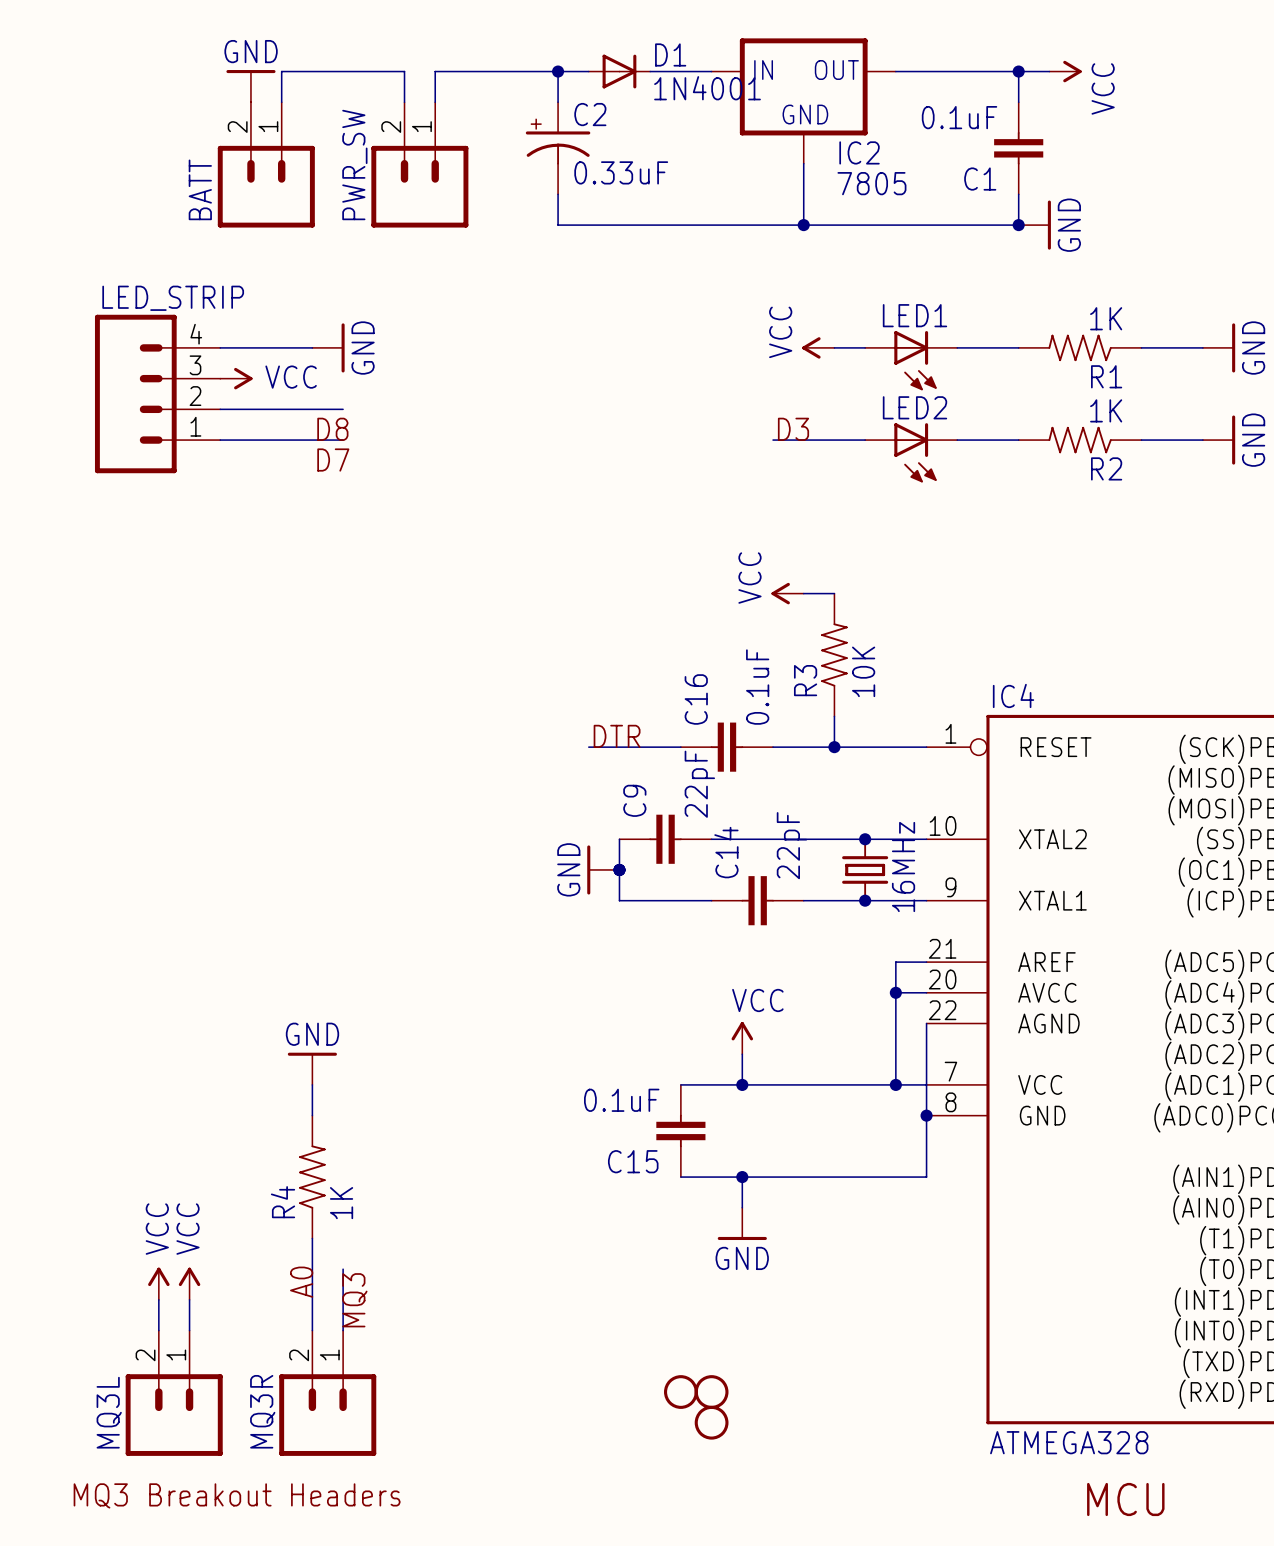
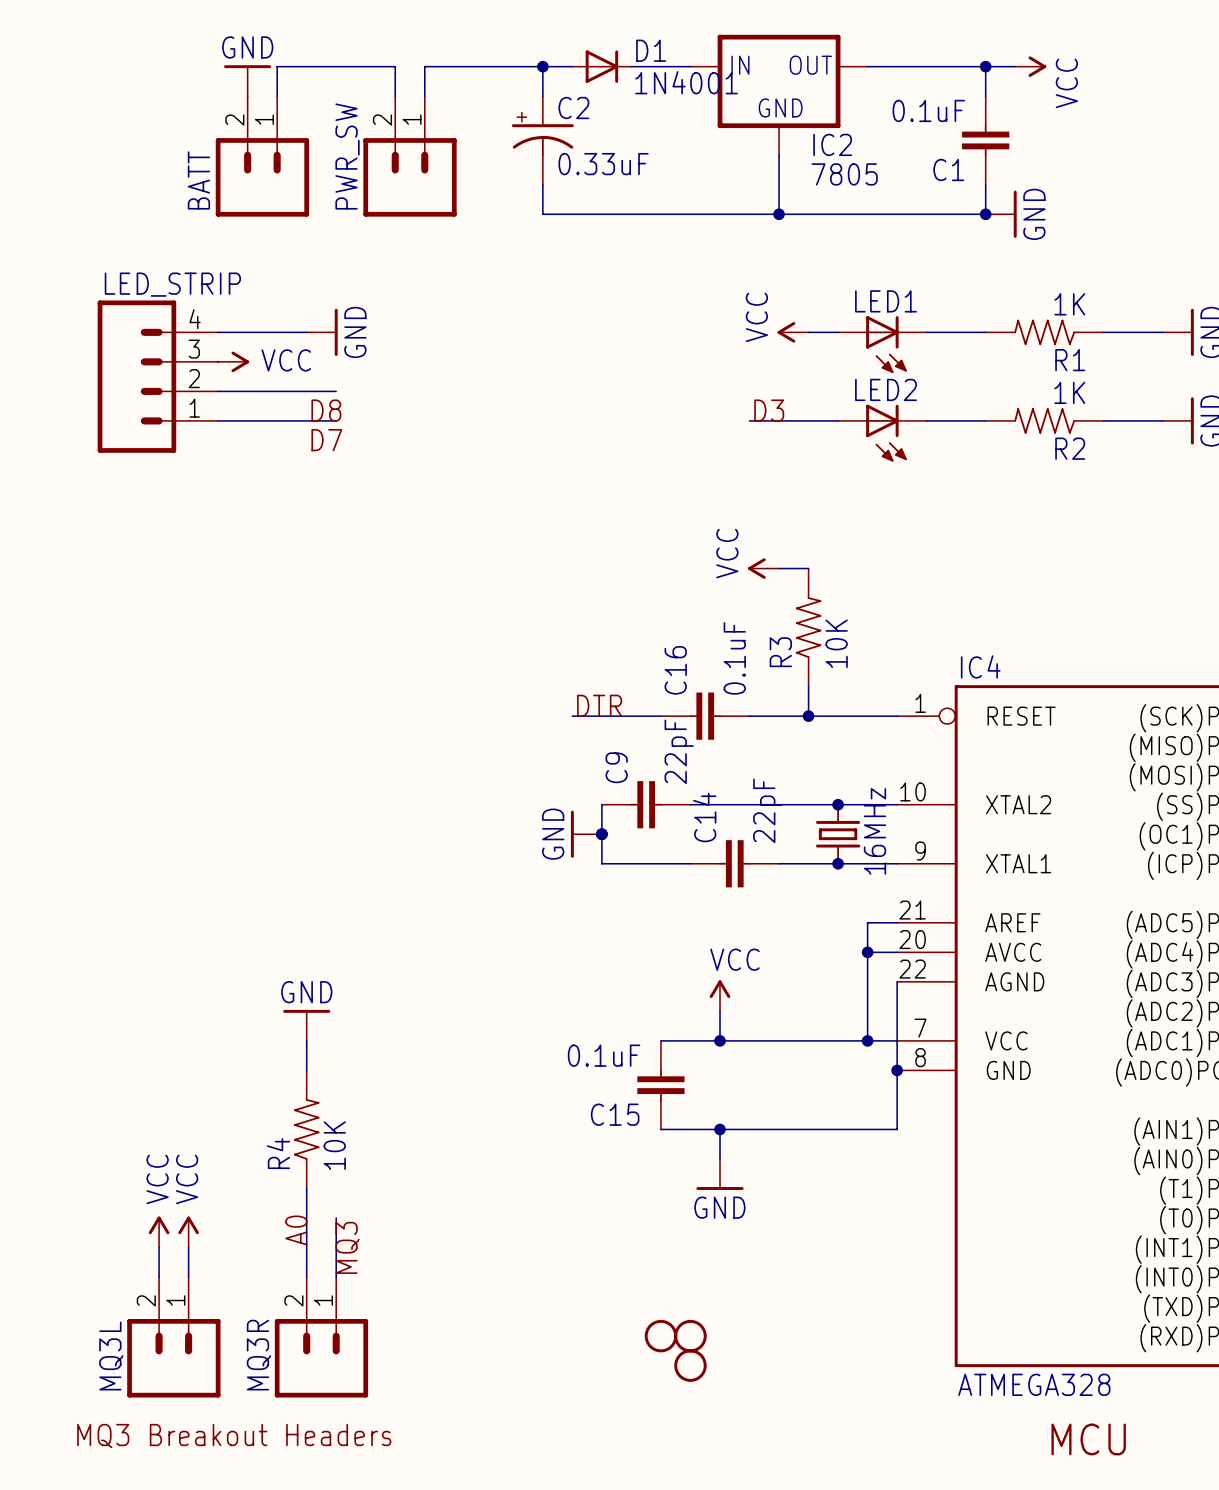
R4 value: 1K (341, 1203) -> 10K (334, 1145)

